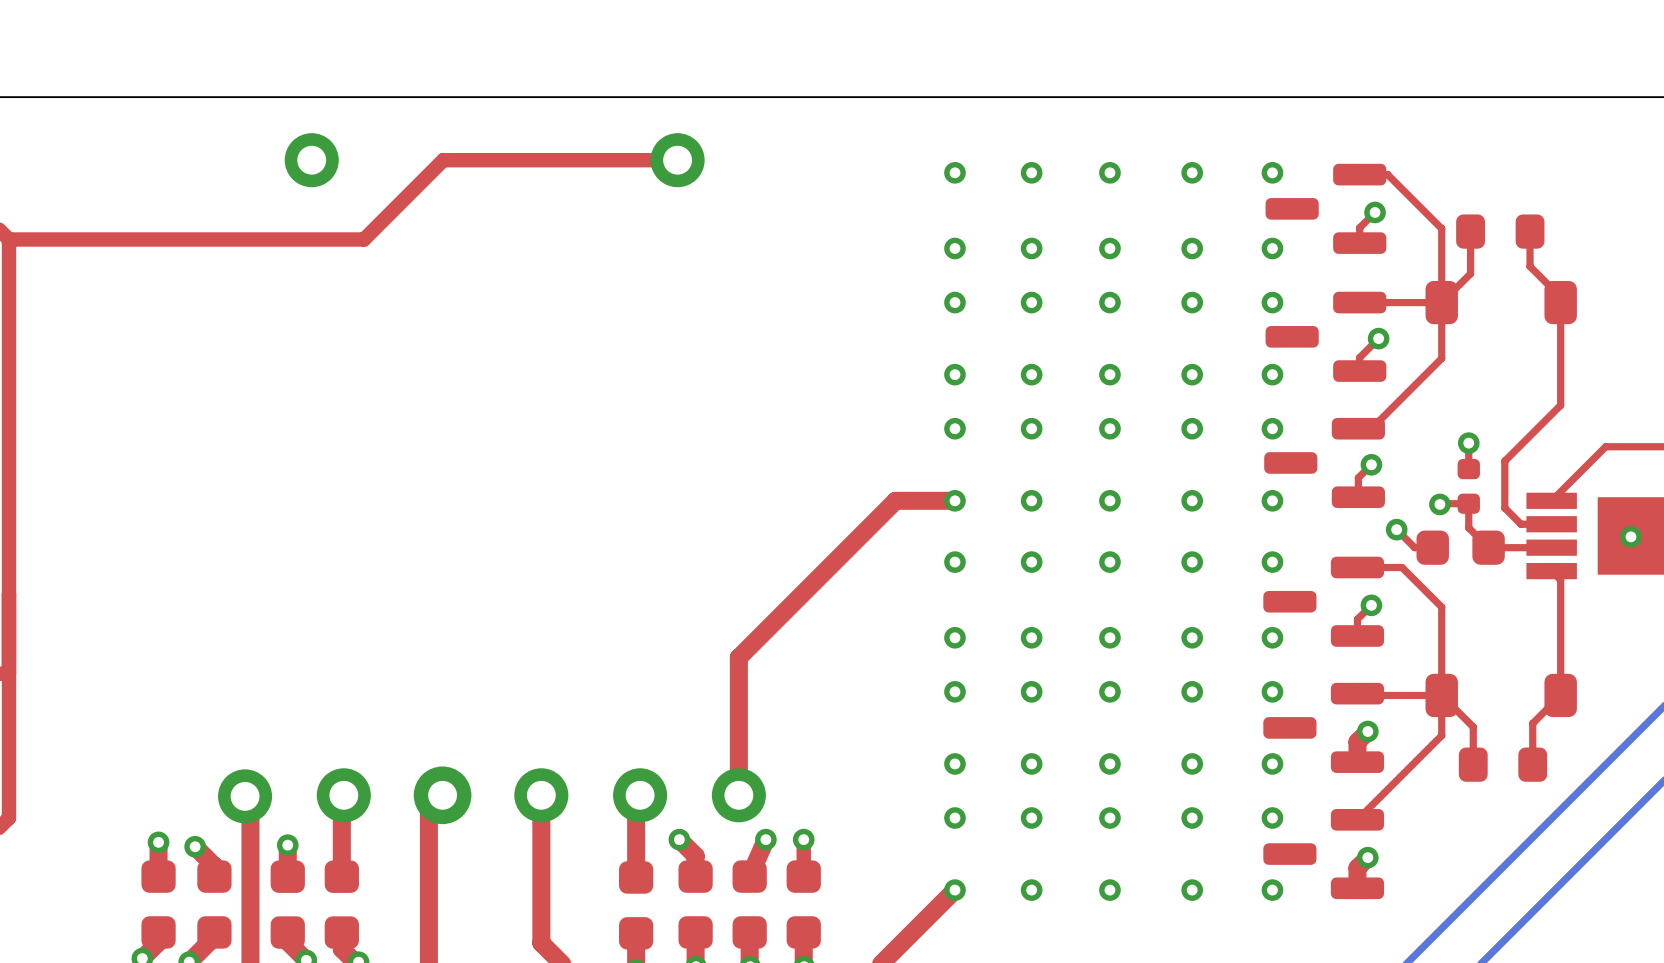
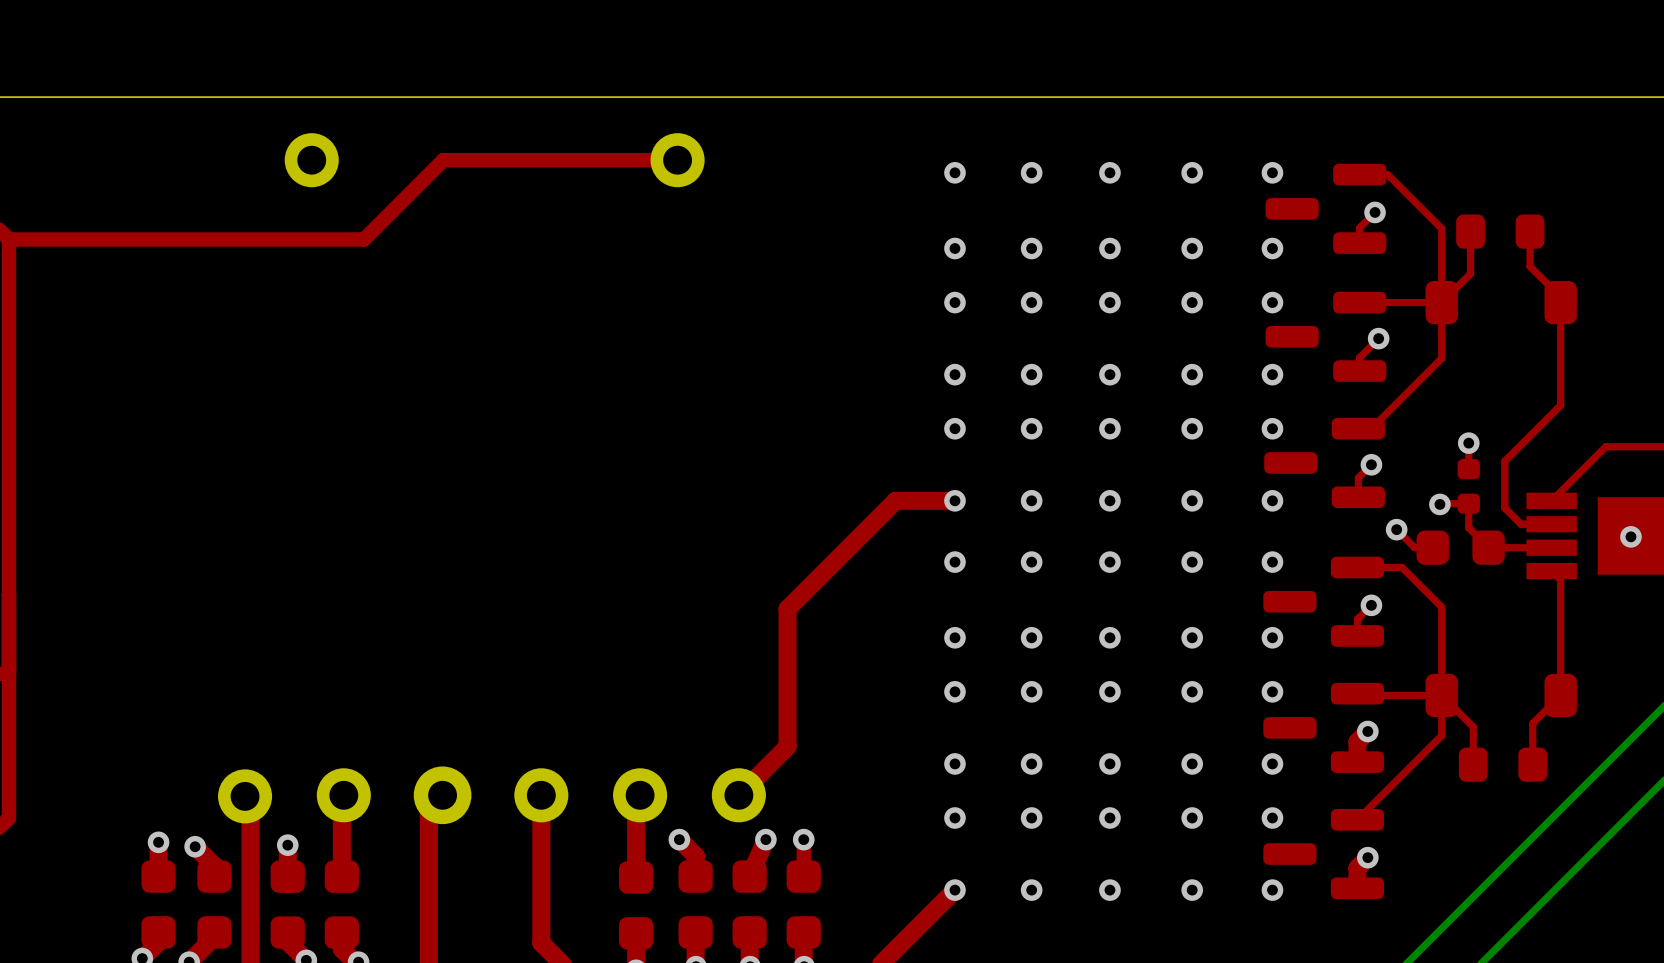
top track: (787, 608) (738, 657) (738, 795) -> (787, 608) (787, 746) (738, 795)

